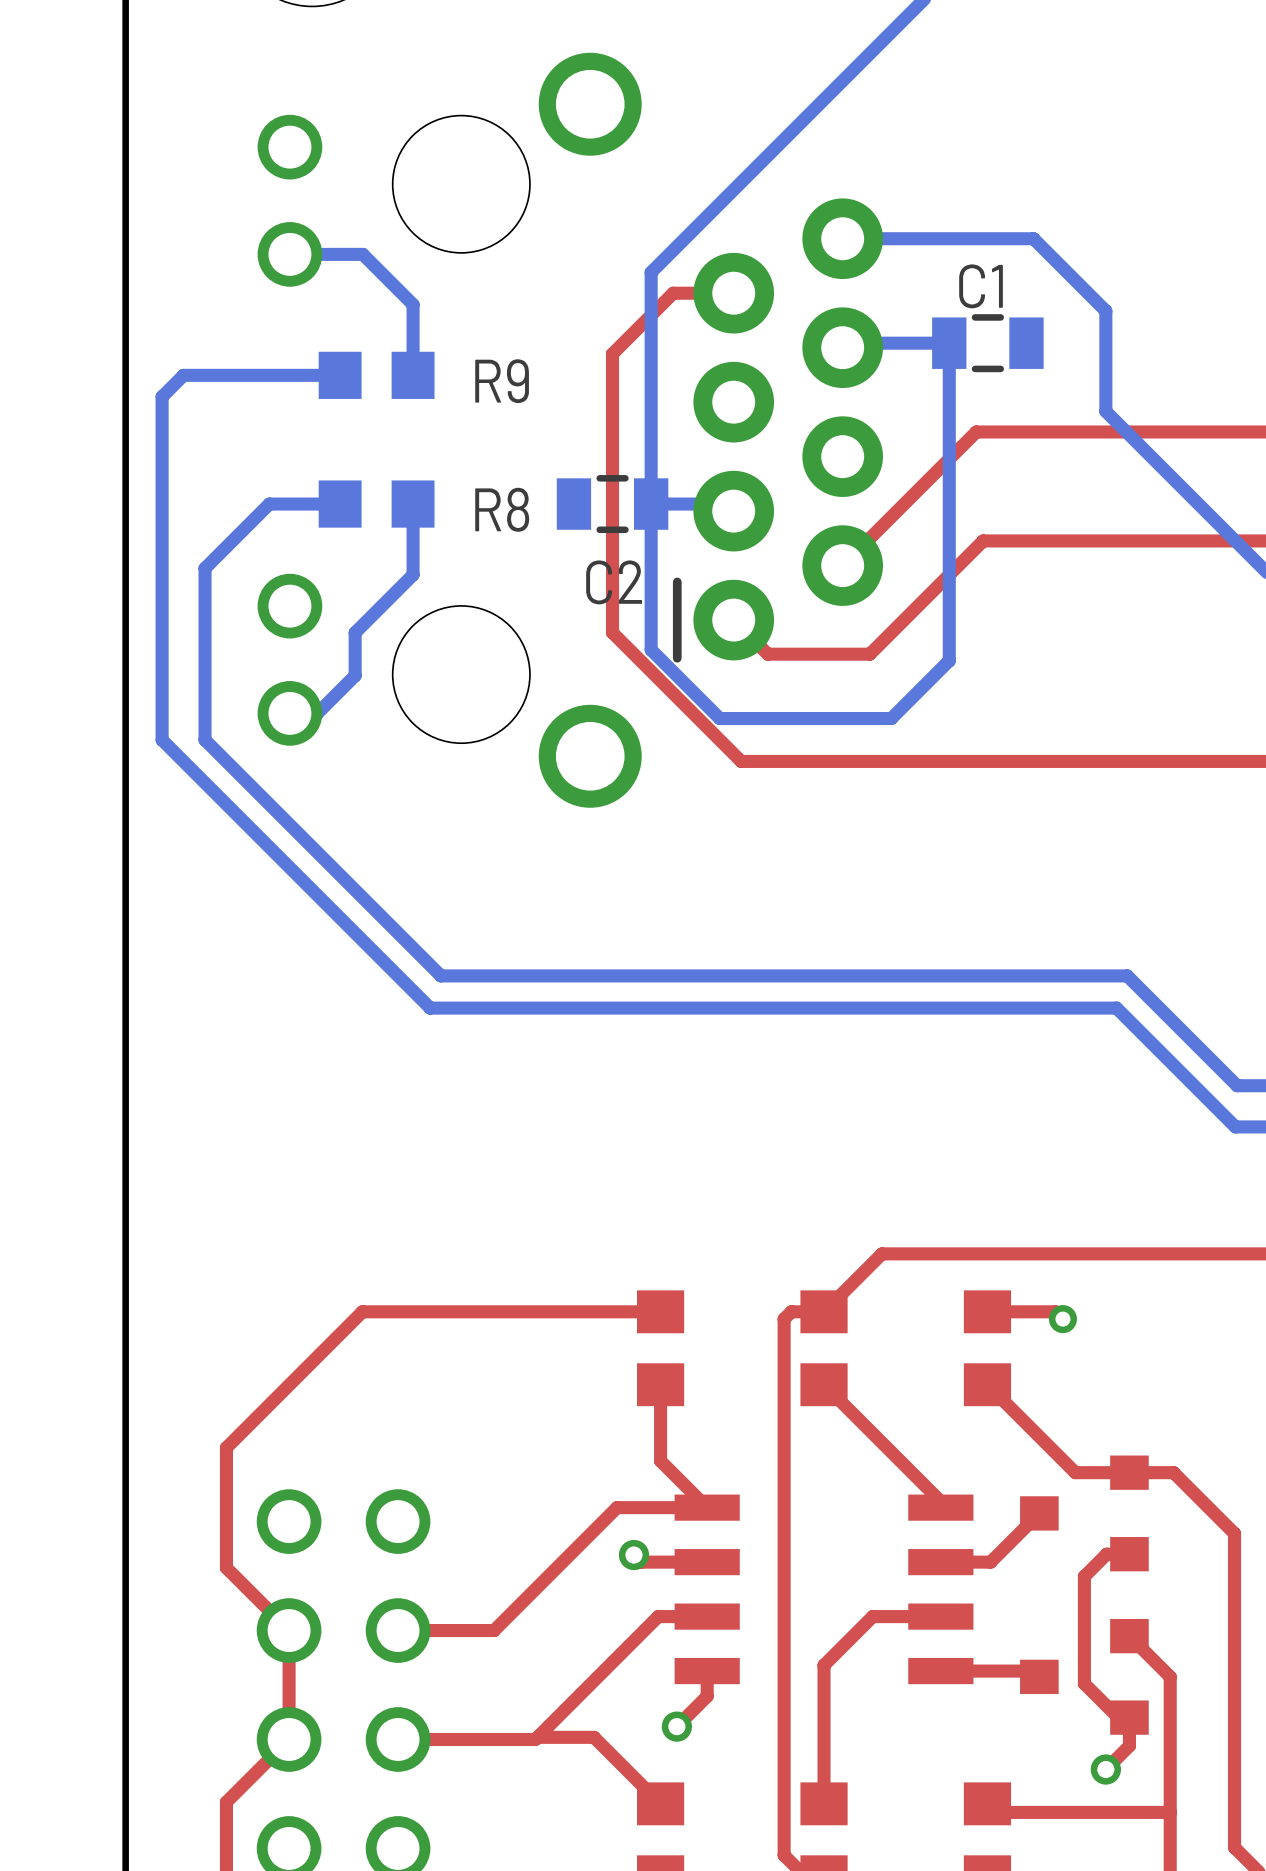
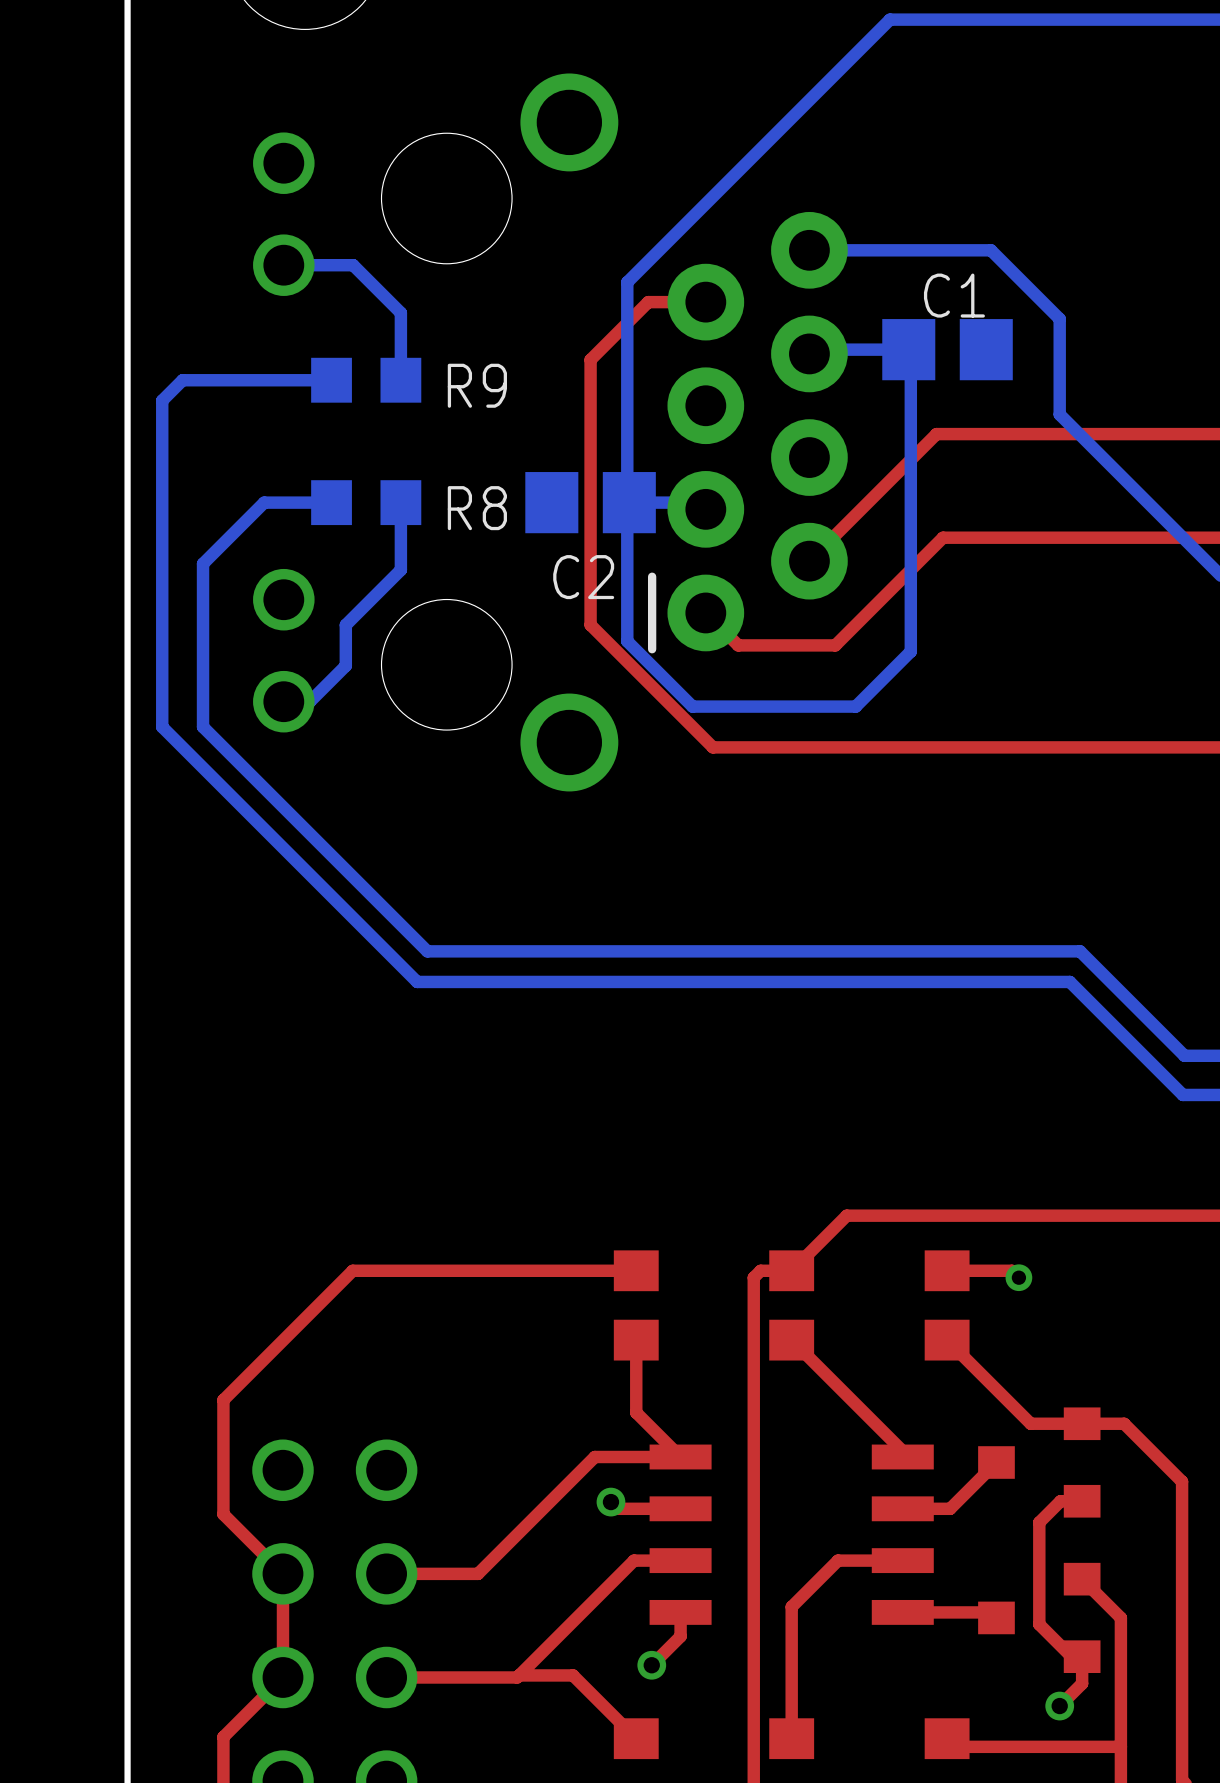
C1 footprint: [932, 314, 1044, 373] -> [882, 319, 1013, 381]
C2 footprint: [556, 475, 669, 534] -> [525, 472, 656, 534]

